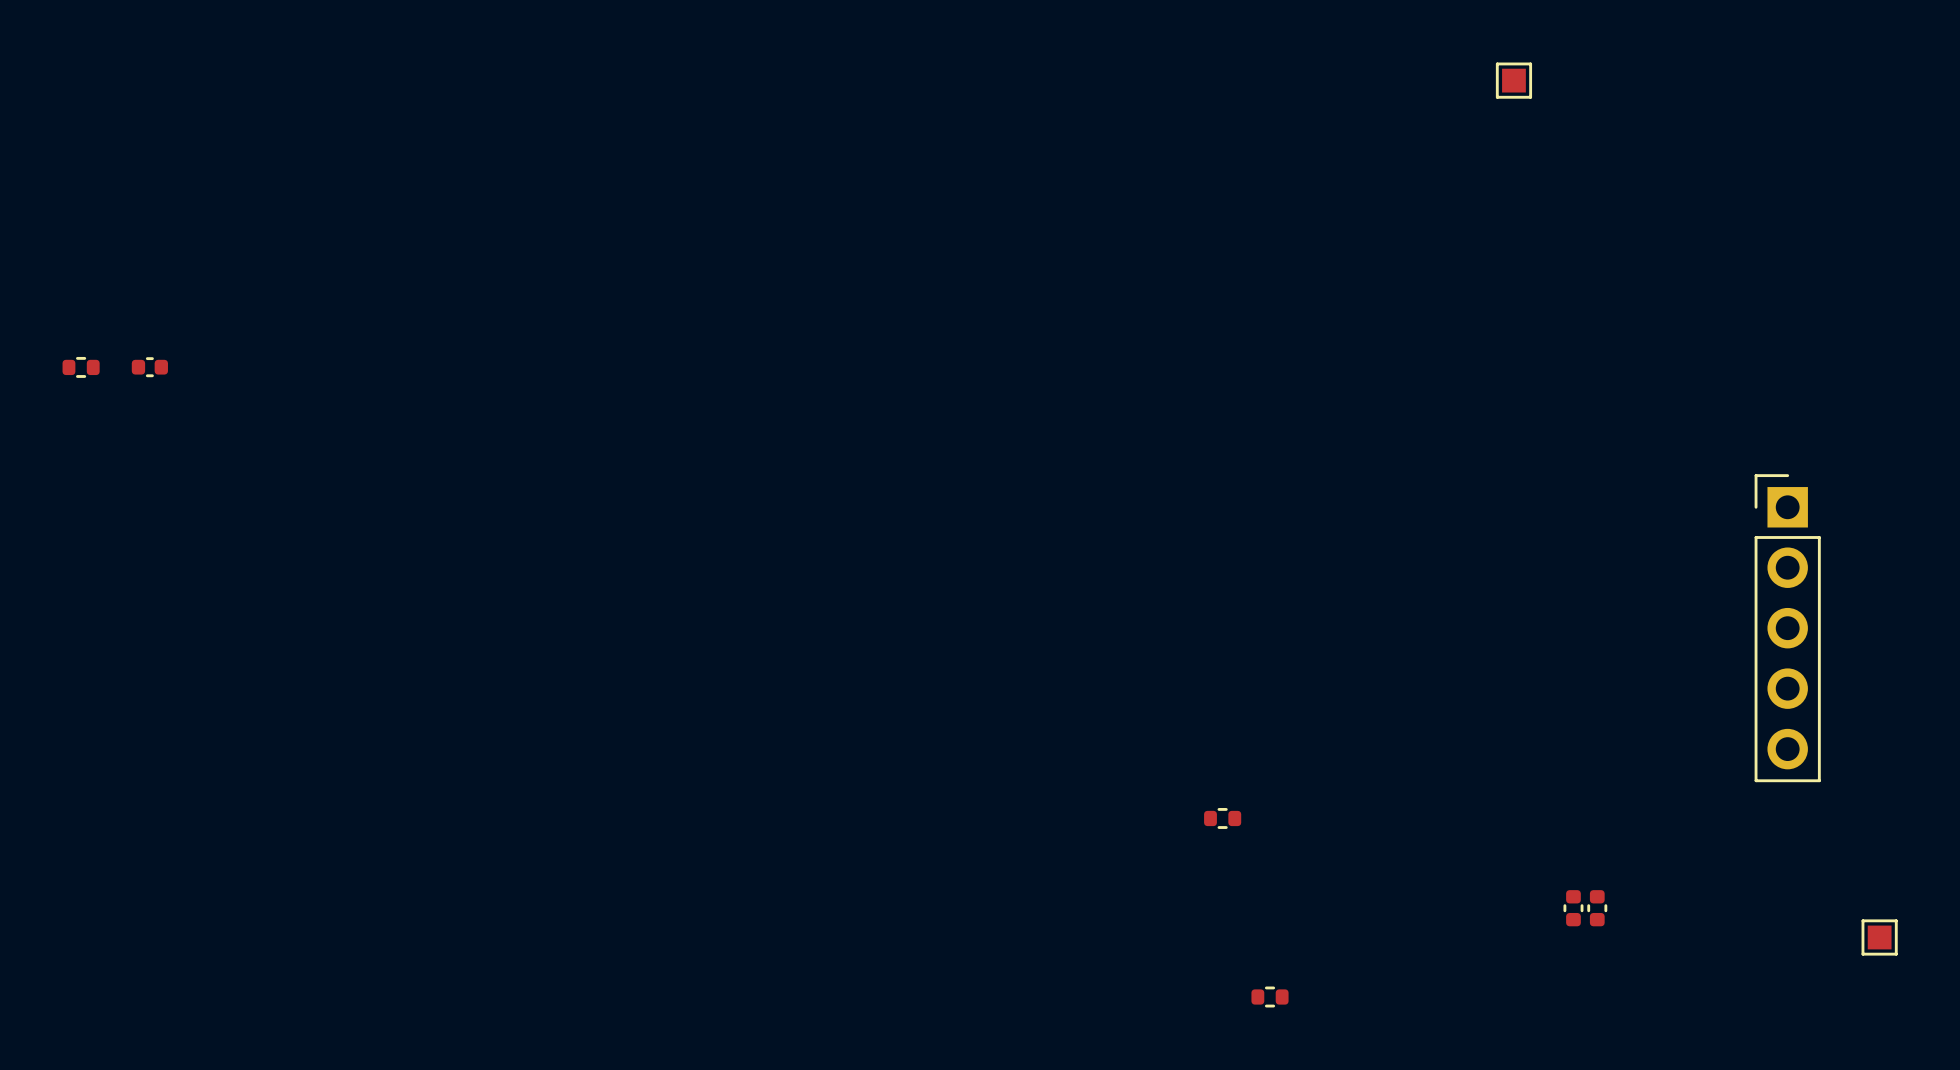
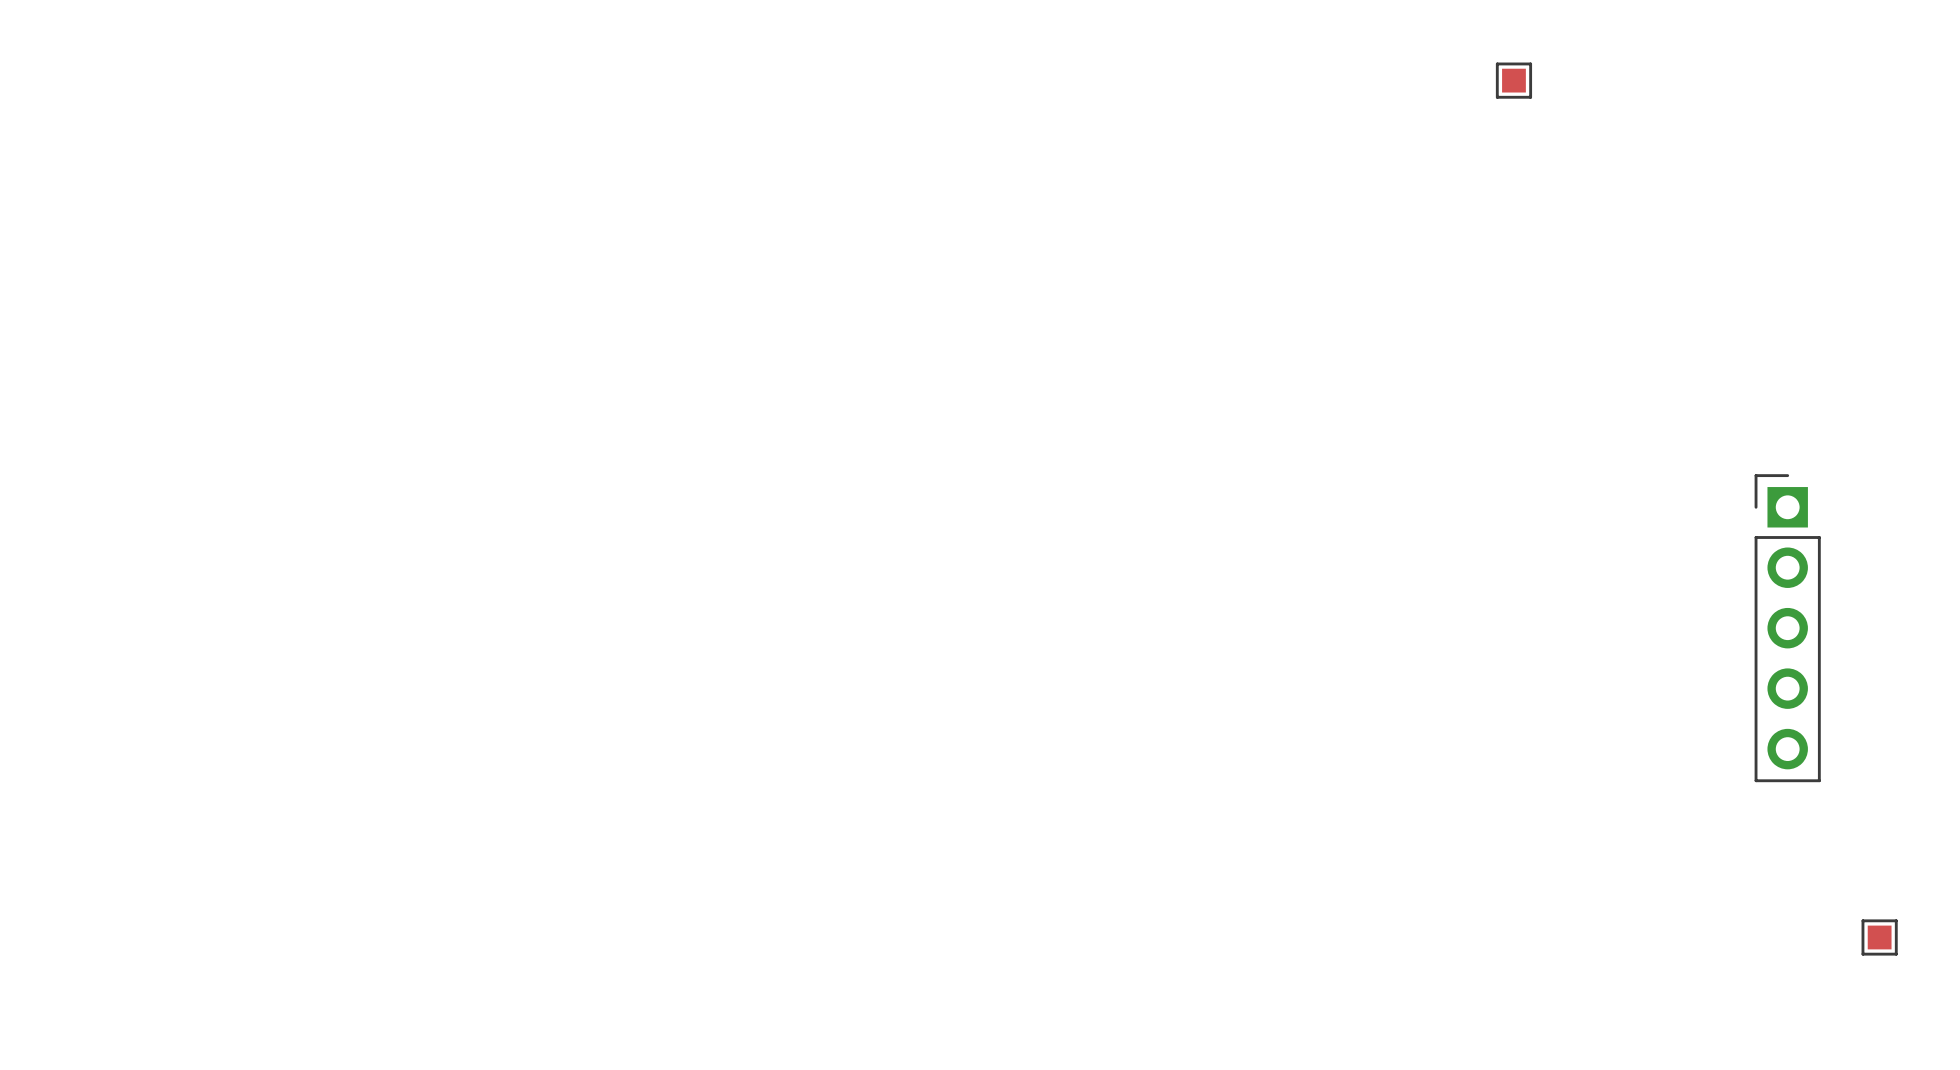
part: (81, 367) -> none
part: (149, 367) -> none
part: (1222, 818) -> none
part: (1573, 908) -> none
part: (1597, 908) -> none
part: (1270, 996) -> none

